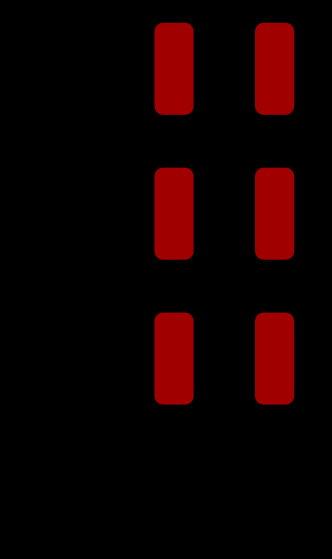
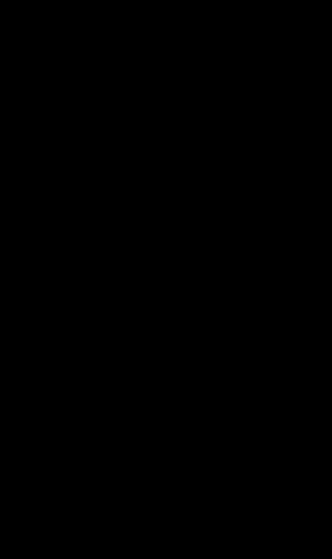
part: (224, 68) -> none
part: (224, 213) -> none
part: (224, 358) -> none

